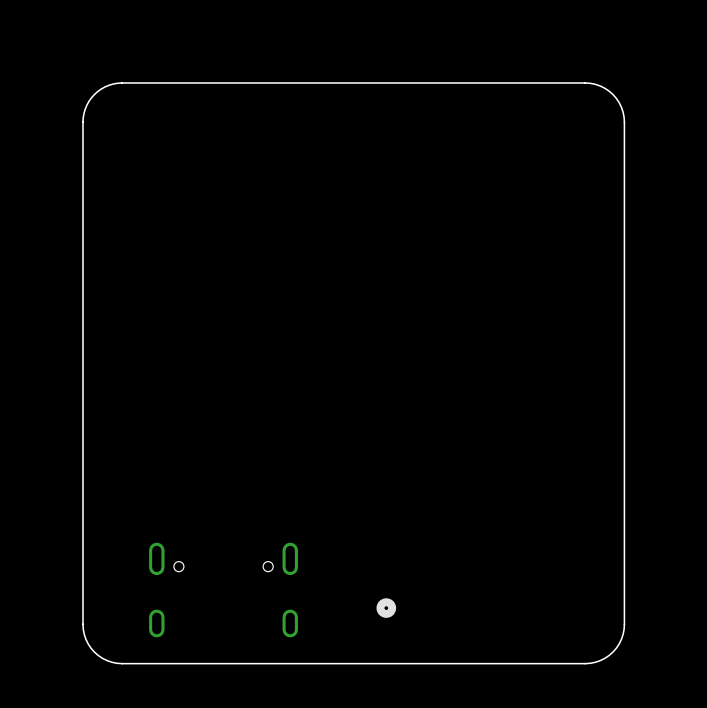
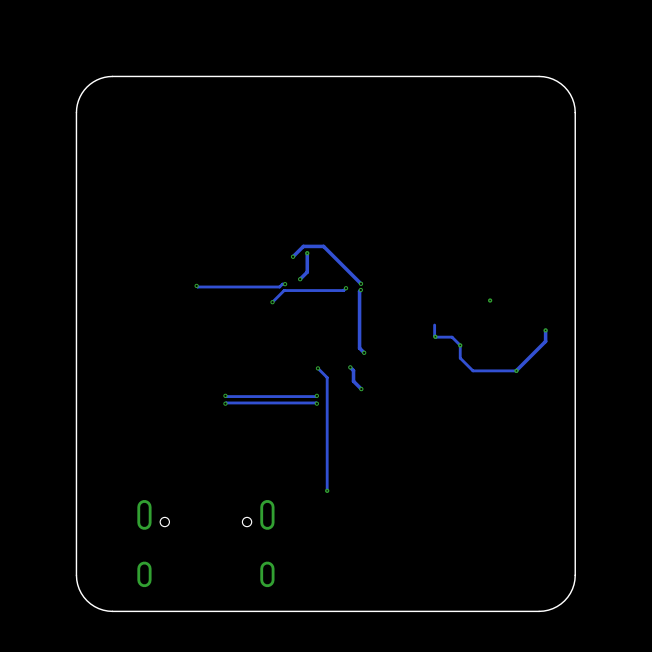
track: none -> (307, 253) (307, 272) (300, 279)
via: none -> (307, 253)
track: none -> (293, 256) (303, 246) (323, 246) (360, 283)
via: none -> (293, 256)
via: none -> (300, 279)
track: none -> (285, 284) (279, 286) (196, 285)
via: none -> (285, 284)
via: none -> (360, 283)
via: none -> (196, 285)
track: none -> (346, 288) (343, 290) (284, 290) (272, 302)
via: none -> (346, 288)
track: none -> (360, 290) (359, 348) (364, 352)
via: none -> (360, 290)
via: none -> (490, 300)
via: none -> (272, 302)
track: none -> (434, 325) (434, 336) (452, 337) (460, 345) (460, 358) (472, 370) (516, 370)
track: none -> (545, 330) (545, 341) (516, 370)
via: none -> (545, 330)
via: none -> (435, 336)
via: none -> (460, 345)
via: none -> (364, 352)
track: none -> (350, 367) (353, 370) (353, 381) (361, 389)
via: none -> (350, 367)
track: none -> (317, 368) (327, 377) (327, 490)
via: none -> (317, 368)
via: none -> (516, 370)
via: none -> (361, 389)
via: none -> (225, 395)
track: none -> (316, 395) (225, 395)
via: none -> (316, 395)
via: none -> (225, 403)
track: none -> (316, 403) (225, 403)
via: none -> (316, 403)
via: none -> (327, 490)
part: (386, 608) -> none

